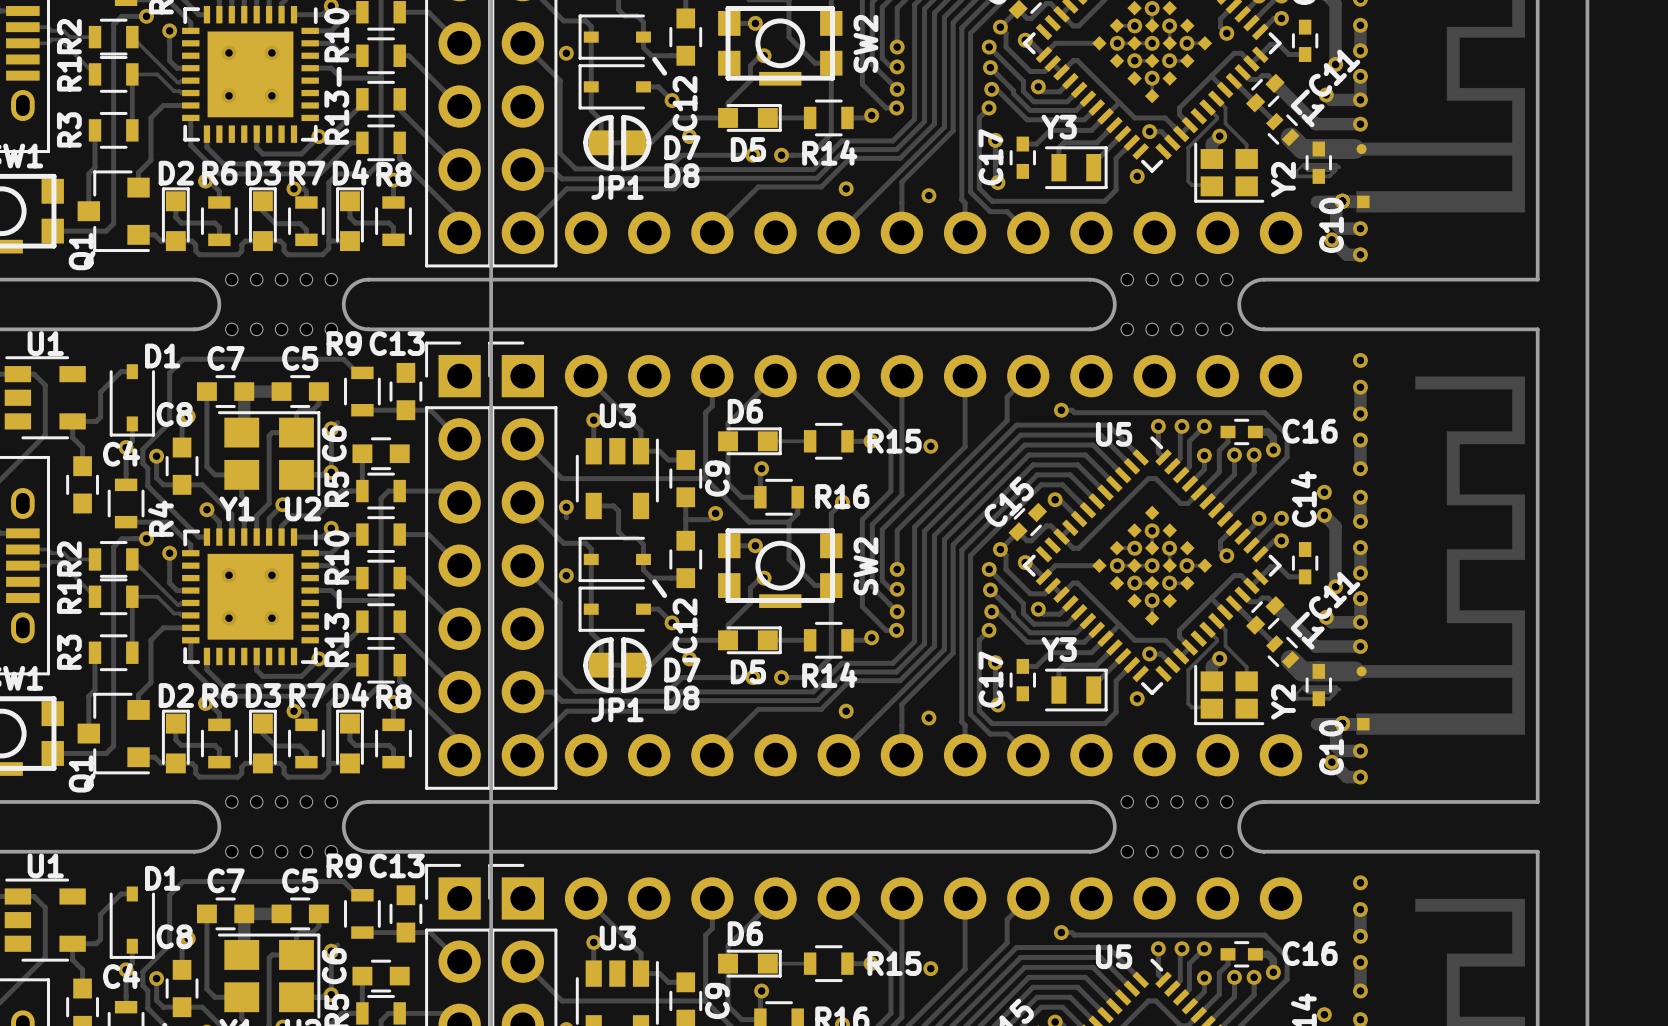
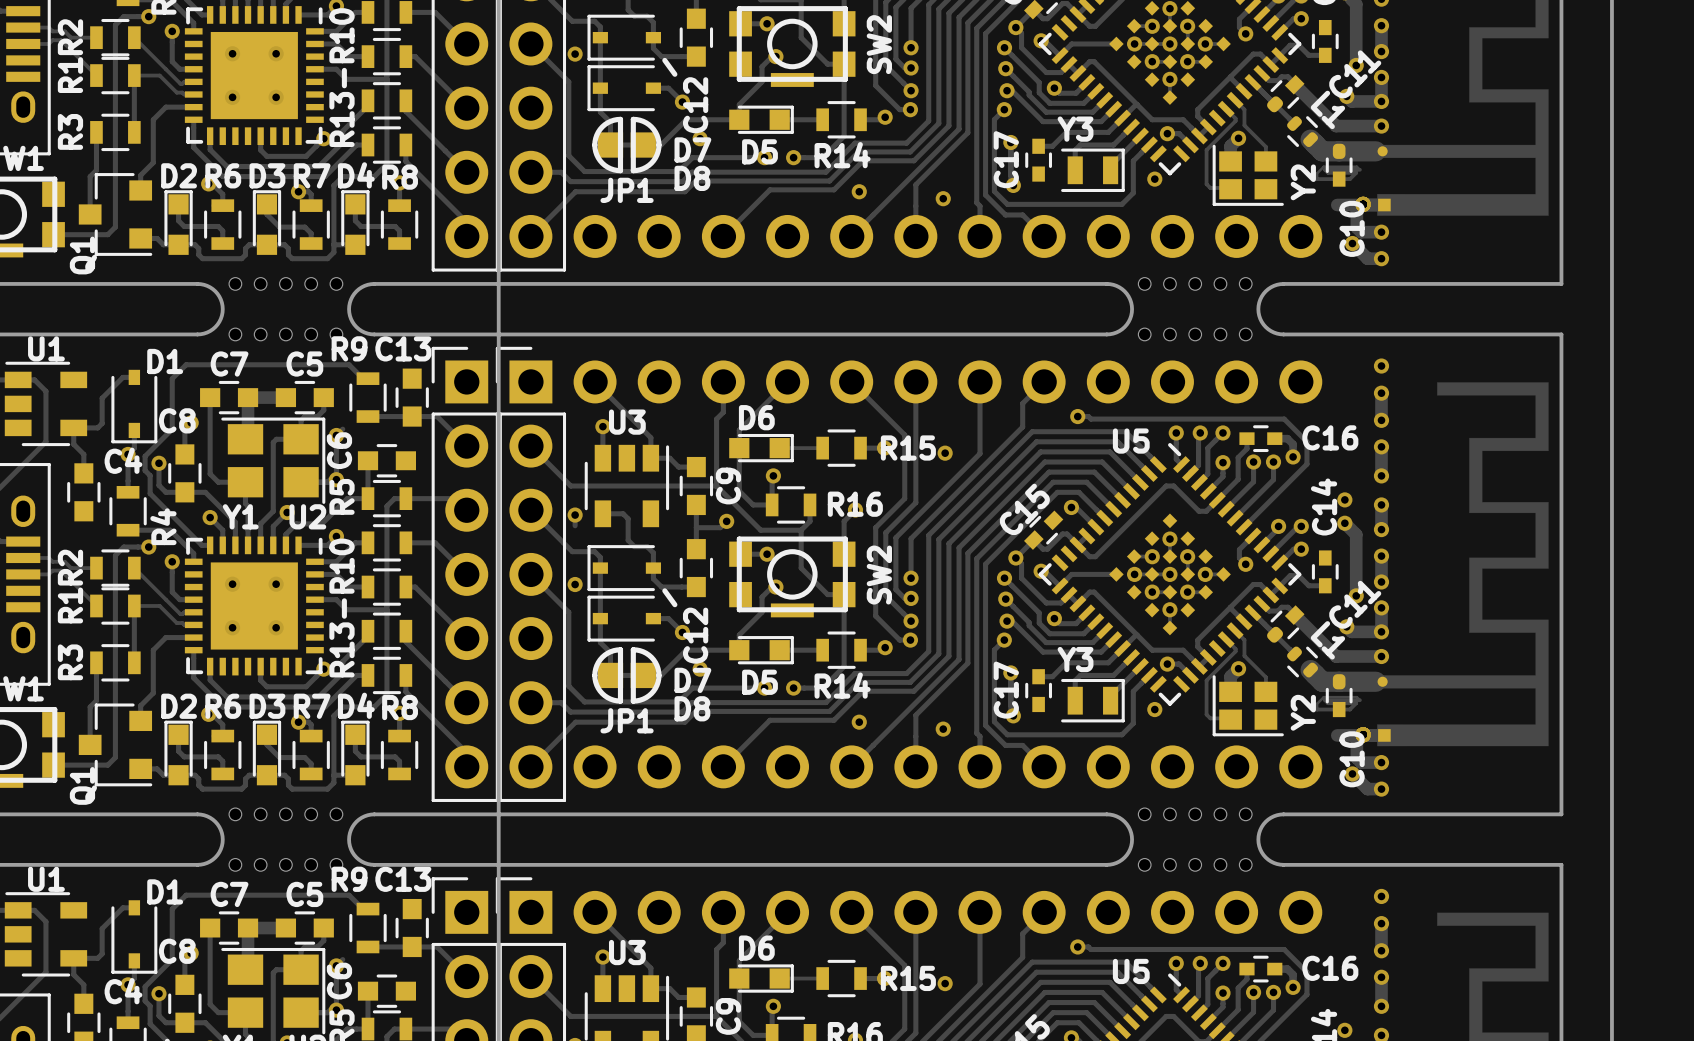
C11 footprint: [1245, 73, 1285, 113] -> [1267, 74, 1305, 113]
L1 footprint: [1266, 112, 1300, 147] -> [1287, 116, 1319, 148]
C10 footprint: [1305, 141, 1332, 184] -> [1325, 143, 1353, 187]
C11 footprint: [1245, 596, 1285, 635] -> [1267, 605, 1305, 643]
L1 footprint: [1266, 635, 1300, 669] -> [1287, 646, 1319, 678]
C10 footprint: [1305, 663, 1332, 707] -> [1325, 674, 1353, 718]

